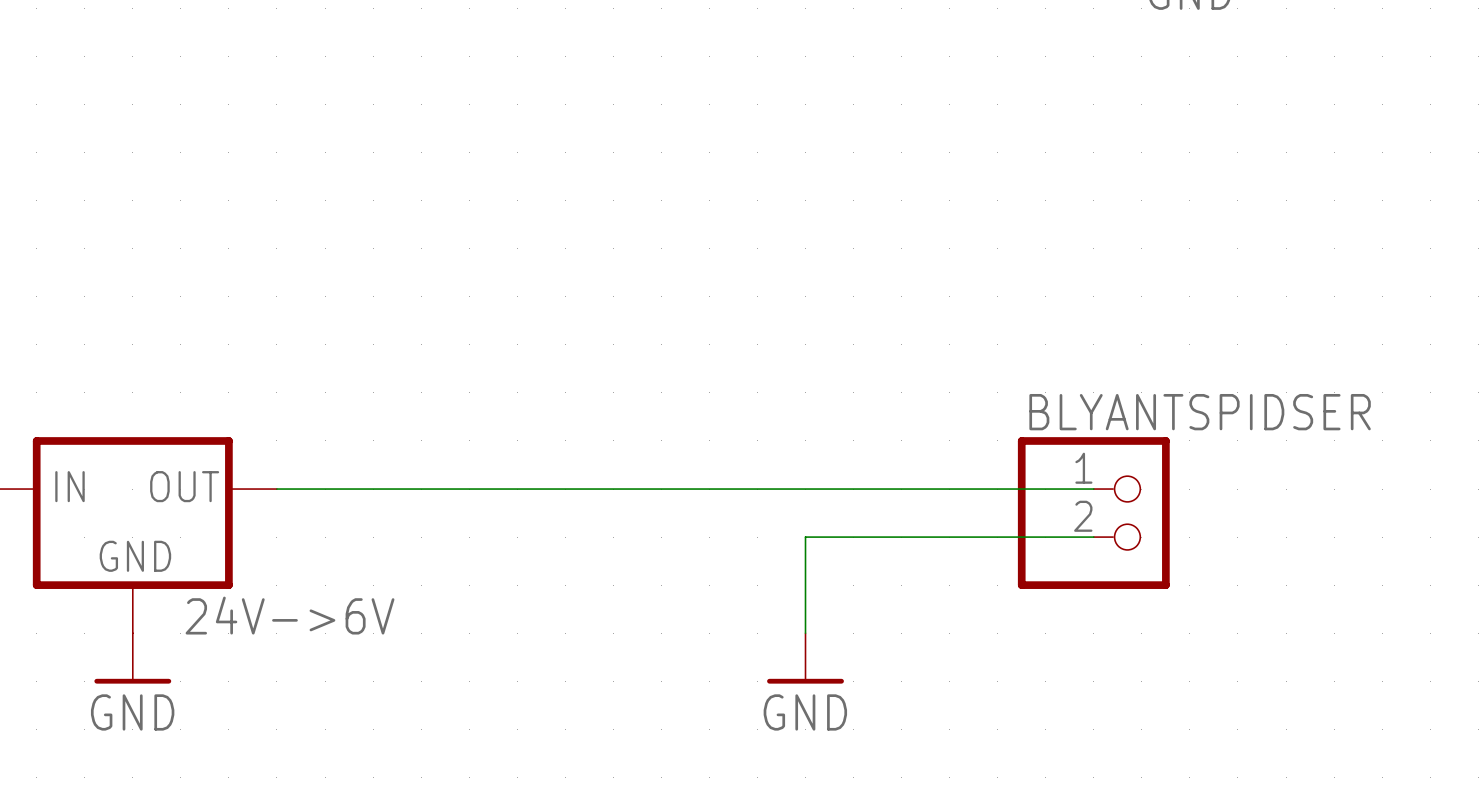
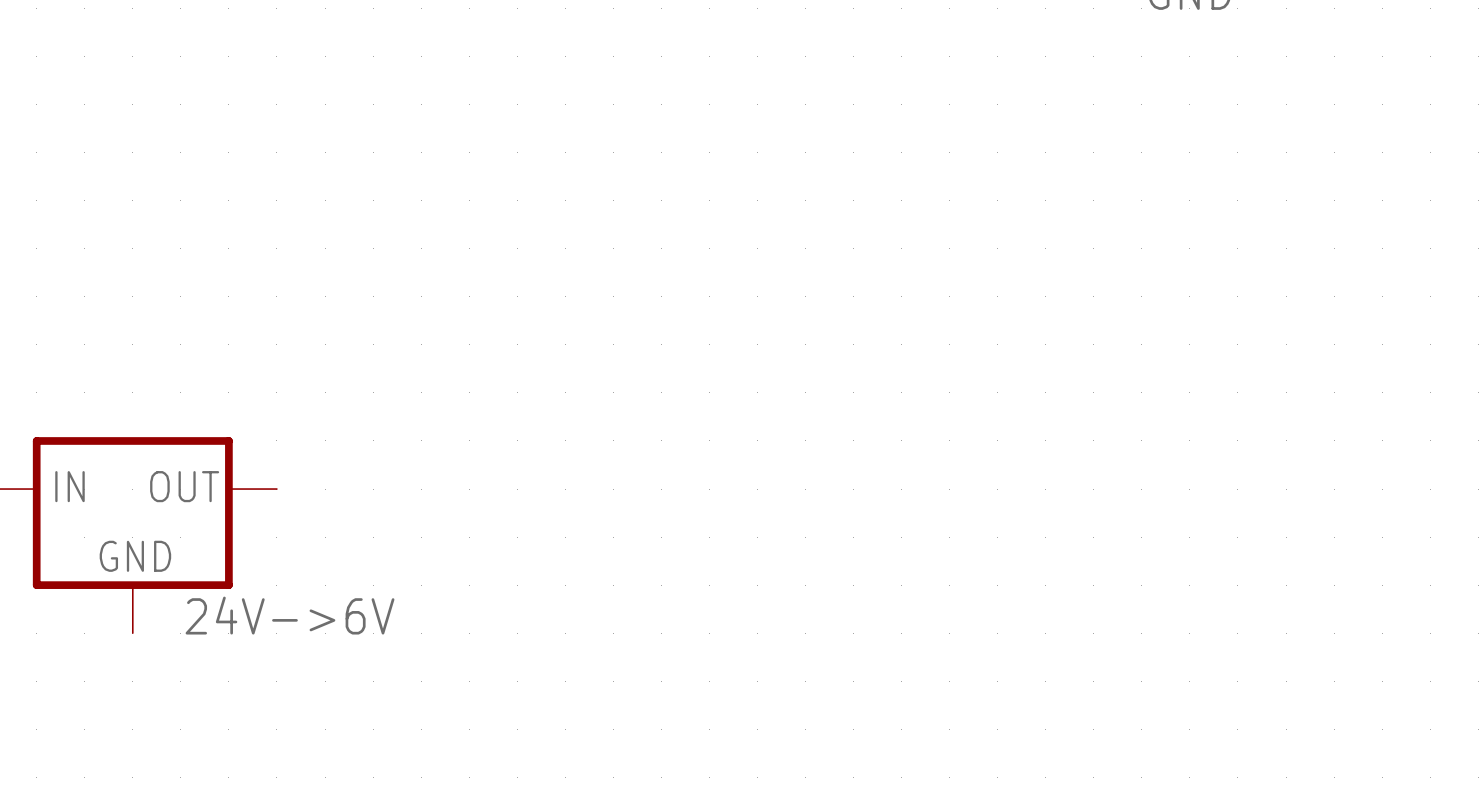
wire: (276, 489) (1093, 489) -> none
BLYANTSPIDSER: (1093, 513) -> none
wire: (1093, 537) (805, 537) (805, 633) -> none
power symbol: GND (132, 658) -> none
power symbol: GND (805, 658) -> none

